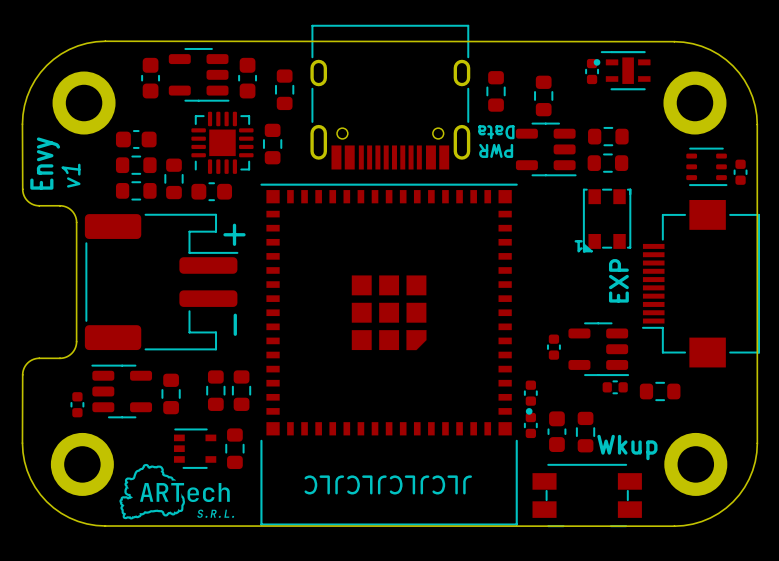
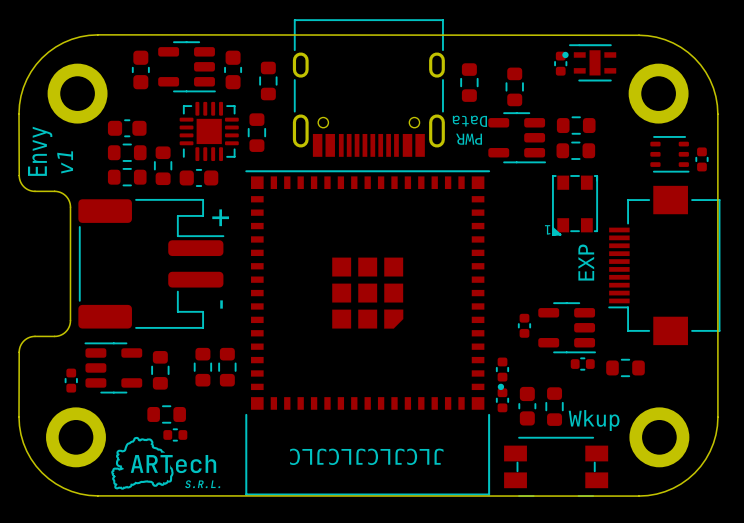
part: (195, 448) -> none
part rotation: 0° (234, 448) -> 90° clockwise (166, 414)
part position: (234, 448) -> (166, 414)
part: none -> (175, 434)

